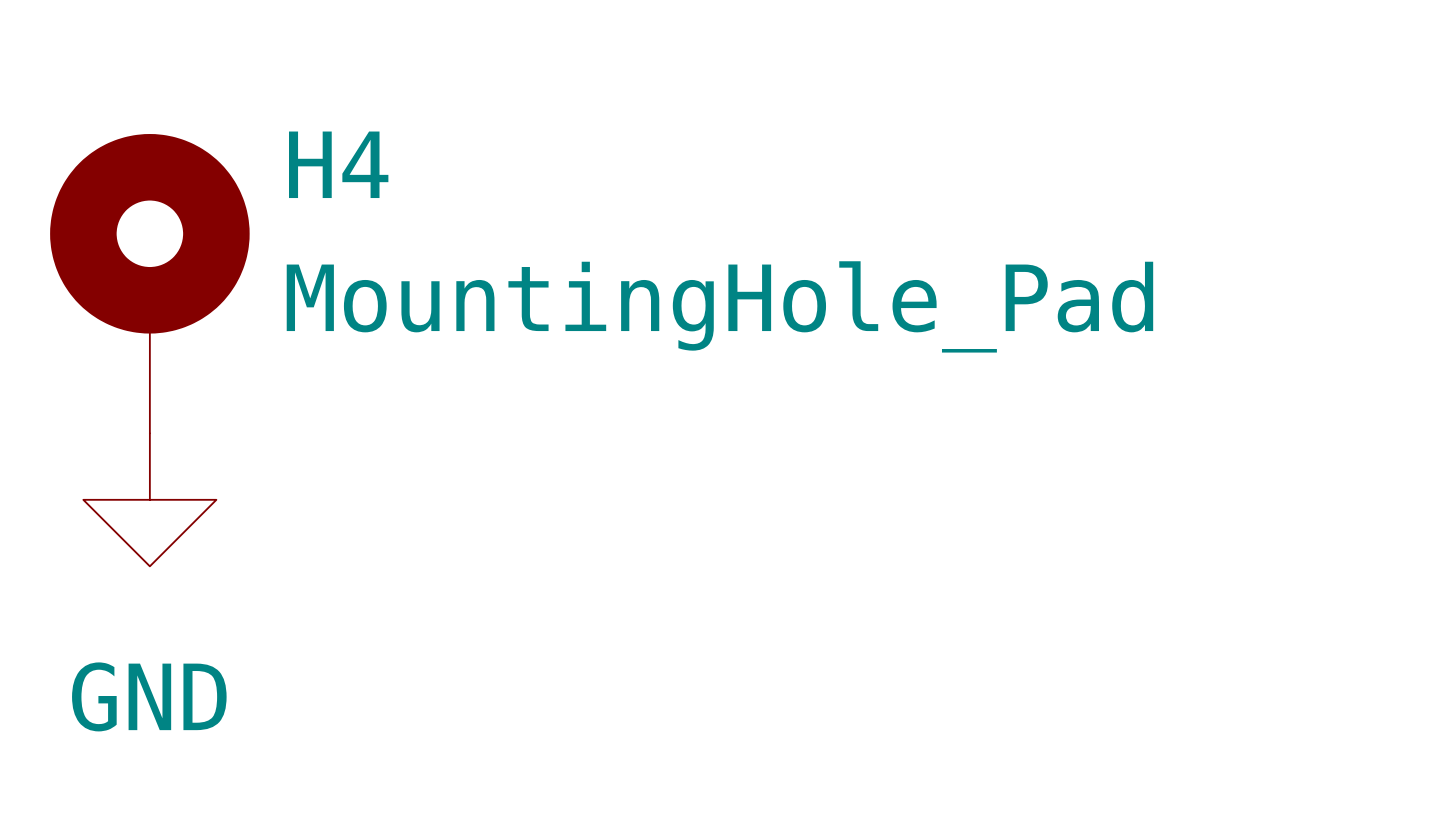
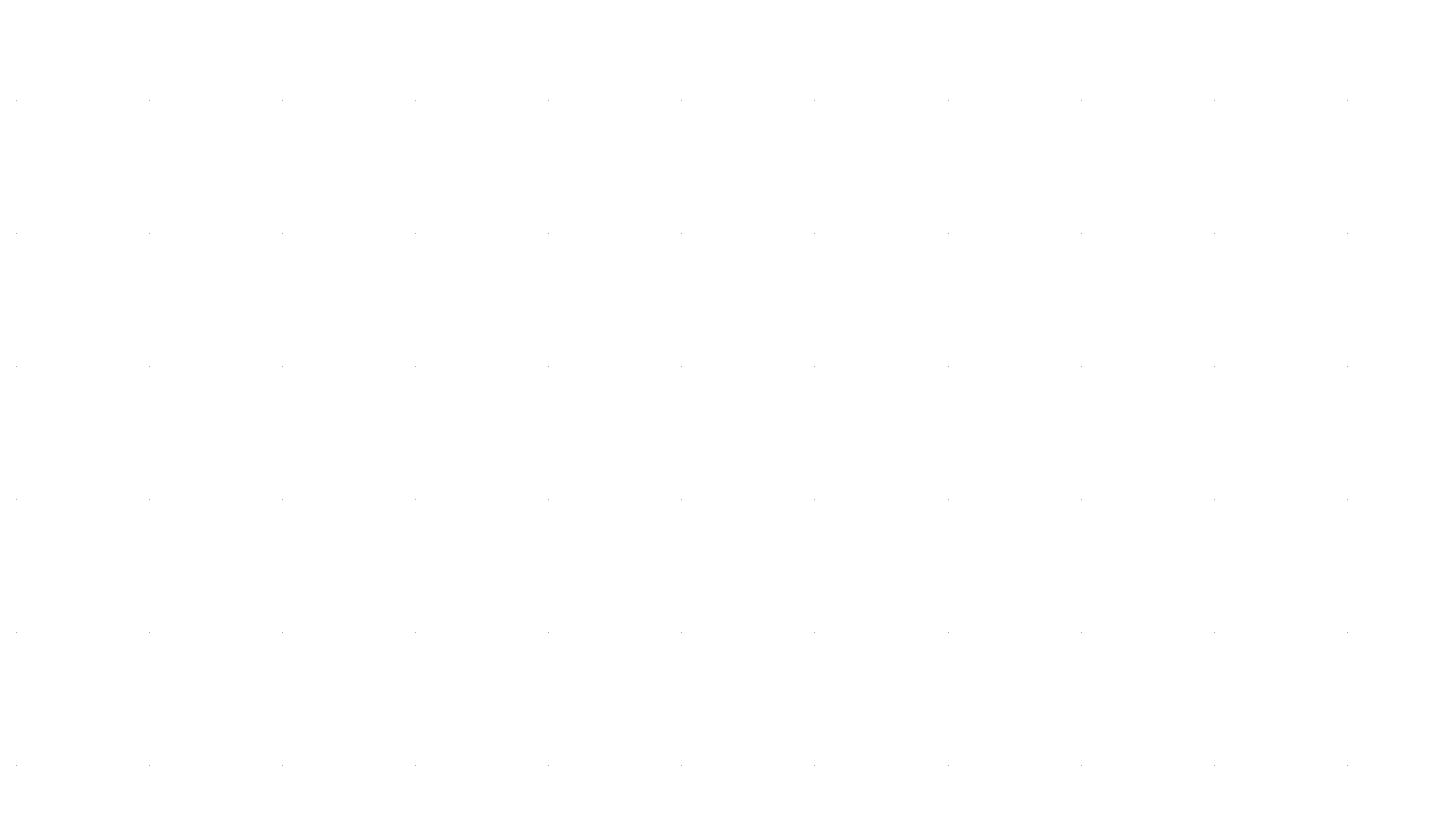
H4: MountingHole_Pad (149, 283) -> none
power symbol: GND (149, 499) -> none

